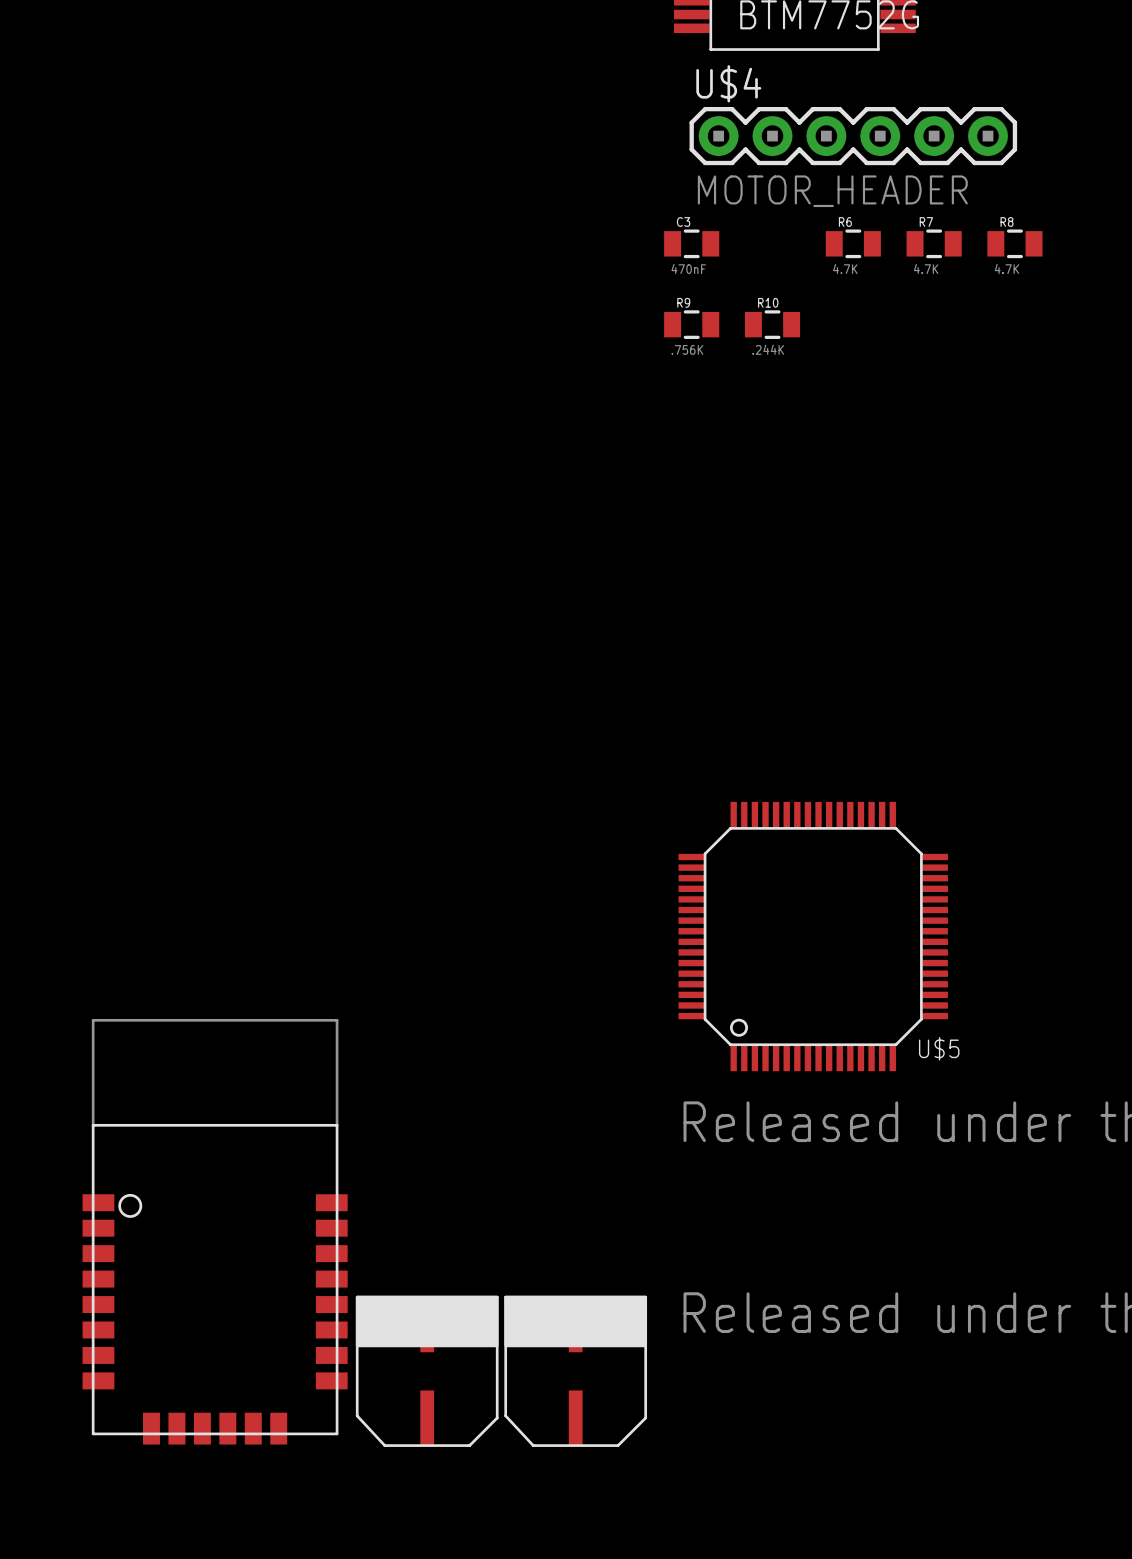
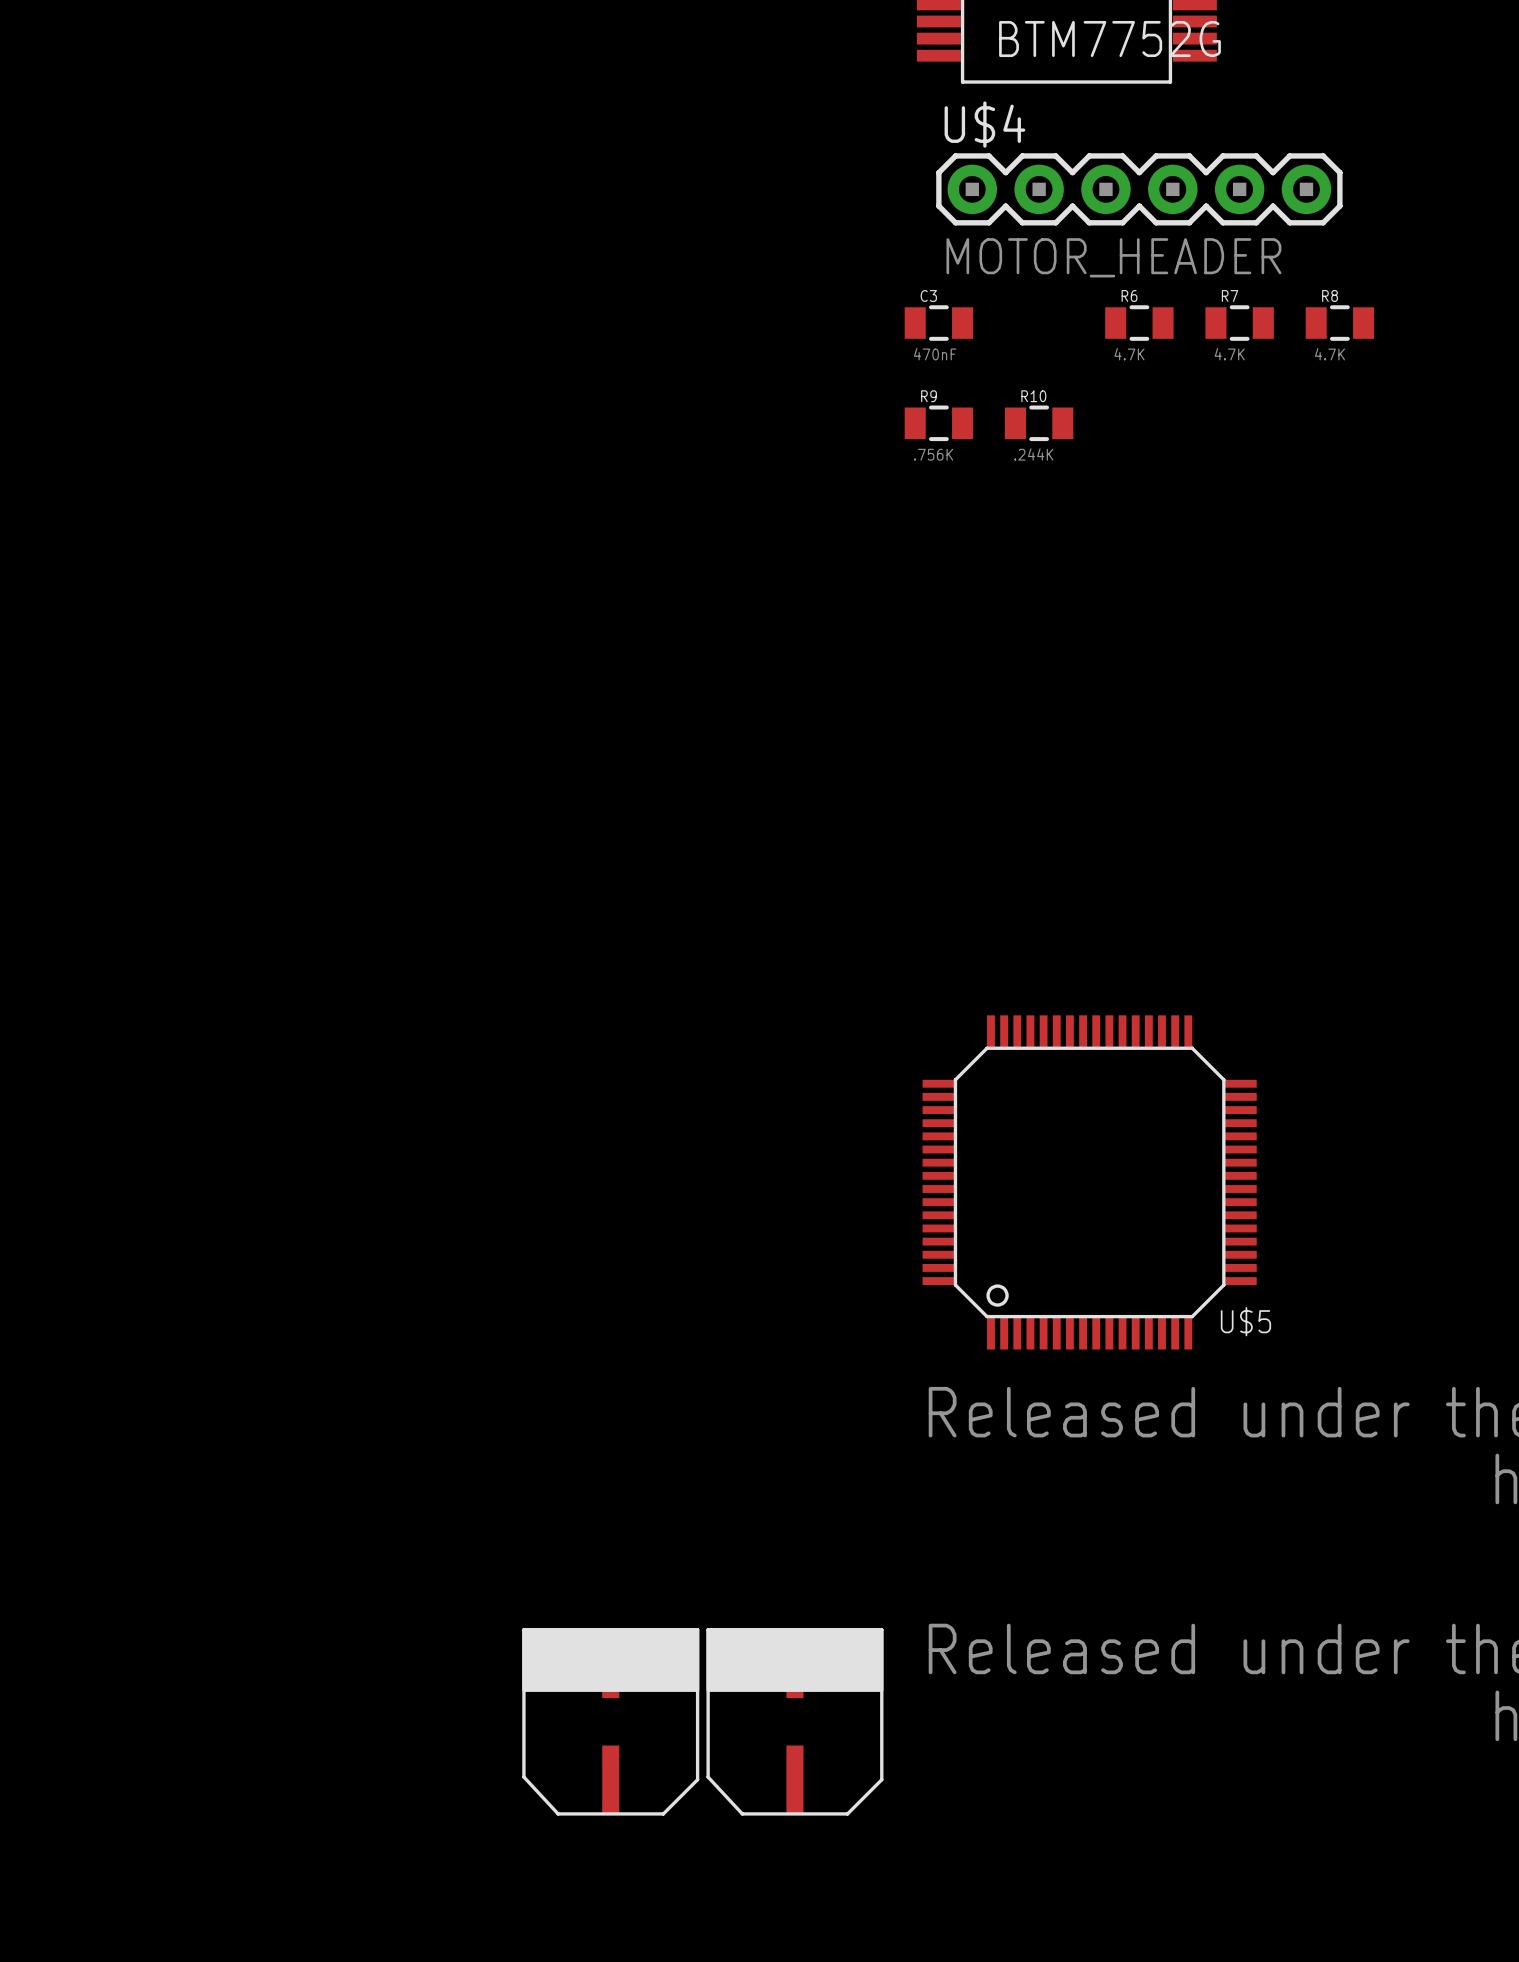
part: (215, 1231) -> none

